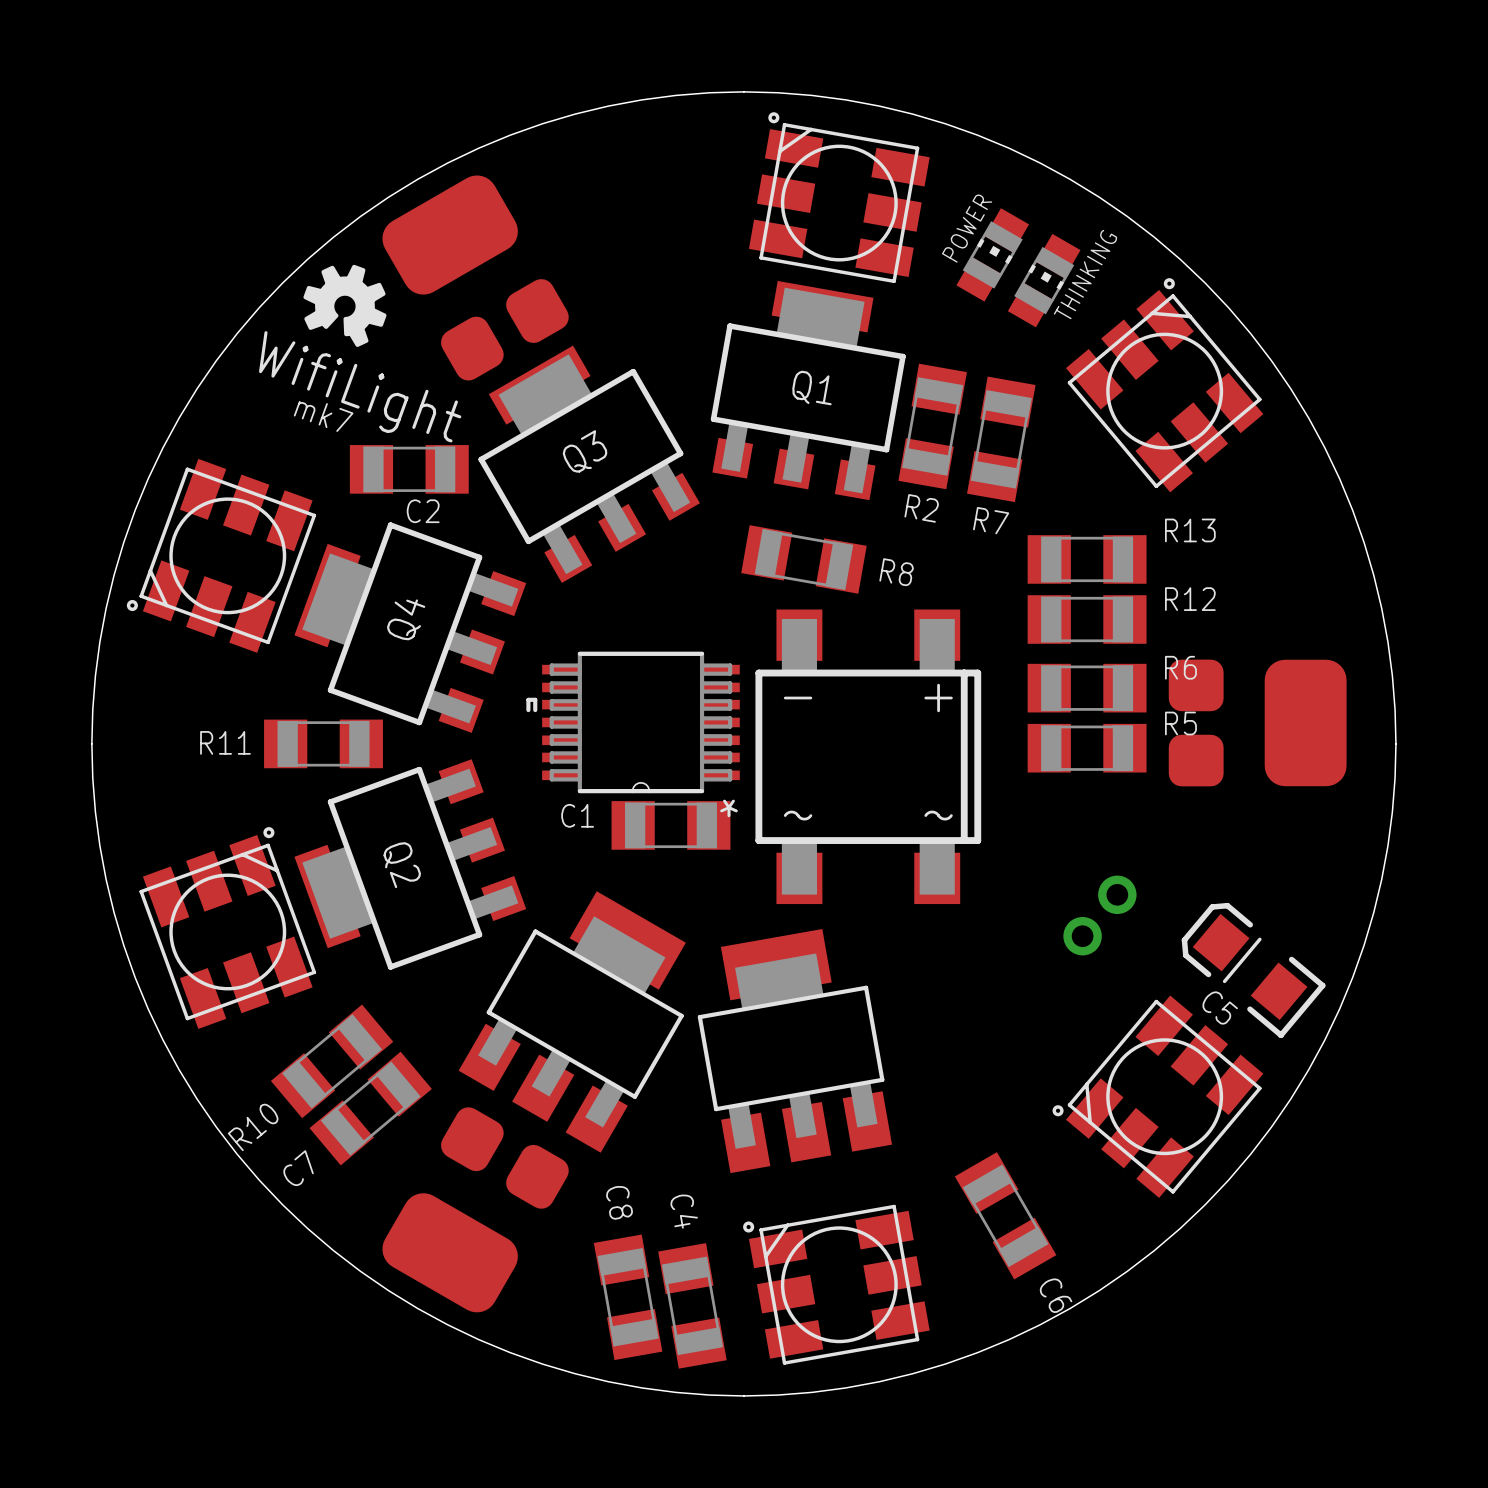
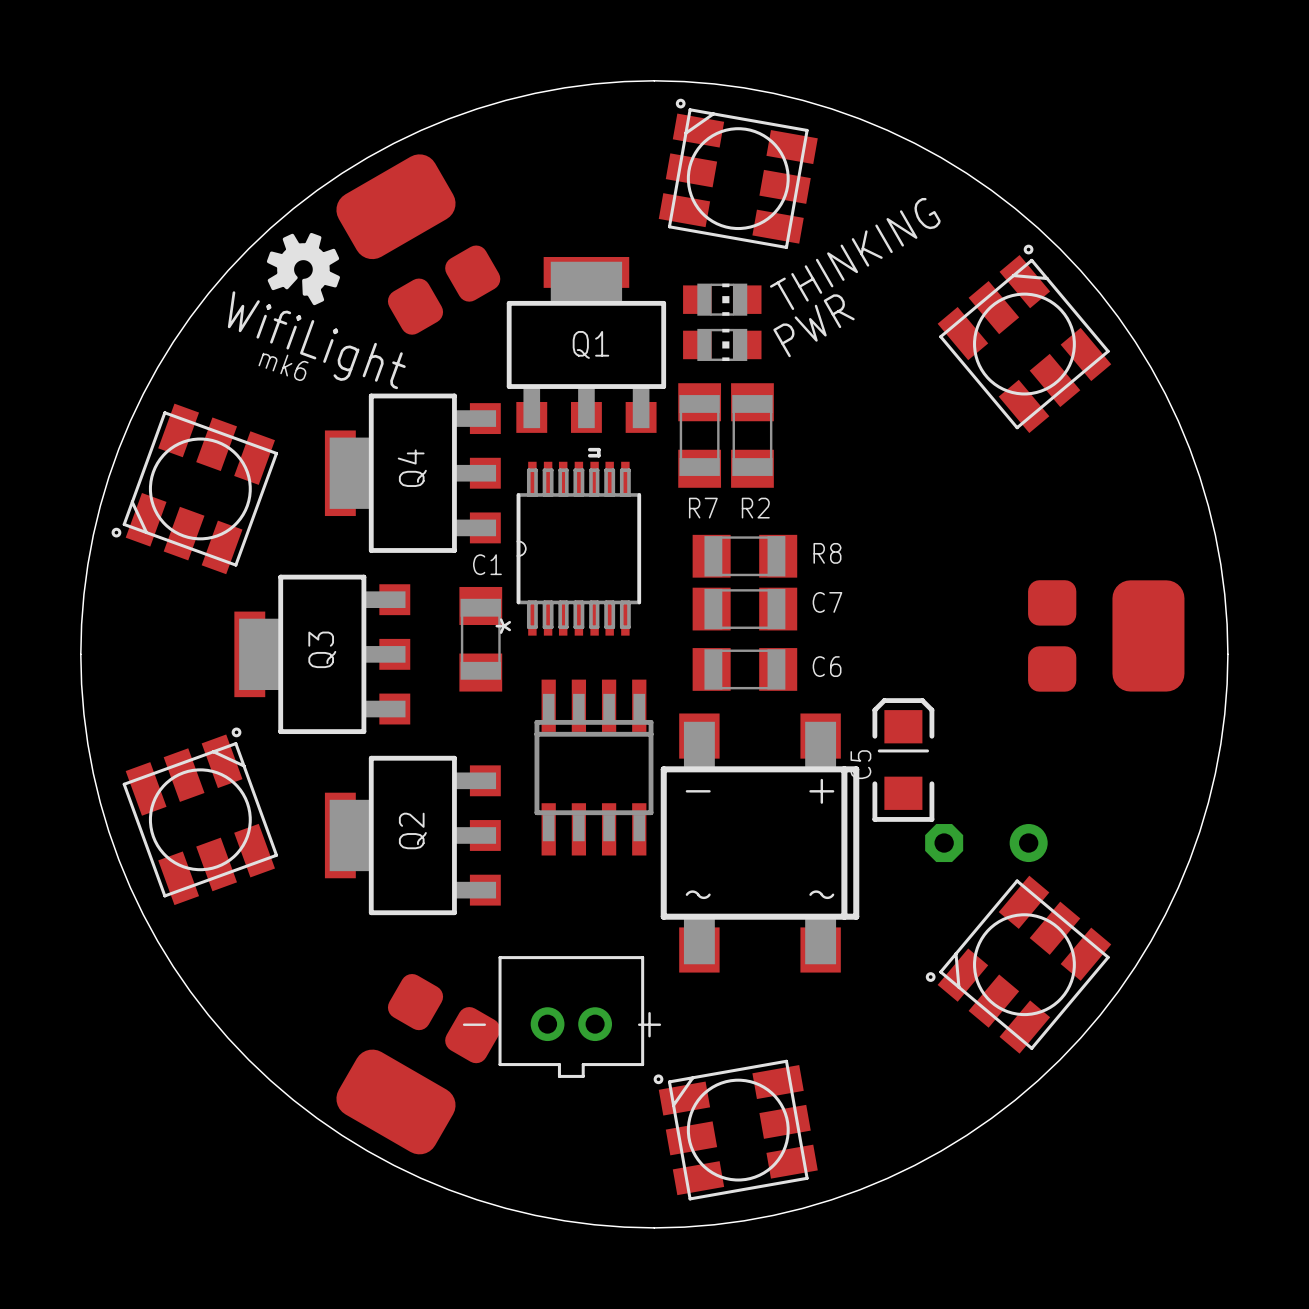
POWER: (992, 254) -> none
THINKING: (1044, 280) -> none
THINKING: none -> (722, 299)
Q1 rotation: 0° (808, 390) -> 10° counterclockwise (586, 344)
Q1 position: (808, 390) -> (586, 344)
PWR: none -> (722, 344)
text: mk7 (323, 416) -> mk6 (283, 366)
R2 rotation: 0° (932, 426) -> 10° counterclockwise (752, 435)
R2 position: (932, 426) -> (752, 435)
R7 rotation: 0° (1001, 439) -> 10° counterclockwise (699, 435)
R7 position: (1001, 439) -> (699, 435)
Q3 rotation: 0° (589, 464) -> 60° counterclockwise (322, 654)
Q3 position: (589, 464) -> (322, 654)
C2: (409, 469) -> none
R8 rotation: 0° (803, 559) -> 10° counterclockwise (744, 556)
R8 position: (803, 559) -> (744, 556)
R13: (1087, 559) -> none
R12: (1087, 619) -> none
Q4 rotation: 0° (410, 627) -> 20° counterclockwise (412, 473)
R6: (1087, 688) -> none
part rotation: 0° (633, 722) -> 90° clockwise (578, 541)
R11: (323, 743) -> none
R5: (1087, 748) -> none
part position: (868, 756) -> (760, 843)
C1 rotation: 0° (670, 825) -> 90° clockwise (480, 639)
C1 position: (670, 825) -> (480, 639)
Q2 rotation: 0° (410, 864) -> 20° clockwise (412, 835)
part: none -> (593, 767)
part side: bottom (1099, 915) -> top (571, 1017)
part: none -> (986, 843)
C5 rotation: 0° (1253, 970) -> 50° clockwise (903, 760)
C5 position: (1253, 970) -> (903, 760)
part: (572, 1021) -> none
part: (794, 1051) -> none
R10: (332, 1061) -> none
C7 rotation: 0° (370, 1108) -> 40° clockwise (744, 609)
C7 position: (370, 1108) -> (744, 609)
C7 name position: C7 (298, 1168) -> C7 (827, 602)
C6 rotation: 0° (1005, 1215) -> 60° counterclockwise (744, 669)
C6 position: (1005, 1215) -> (744, 669)
C8: (628, 1297) -> none
C4: (692, 1305) -> none

